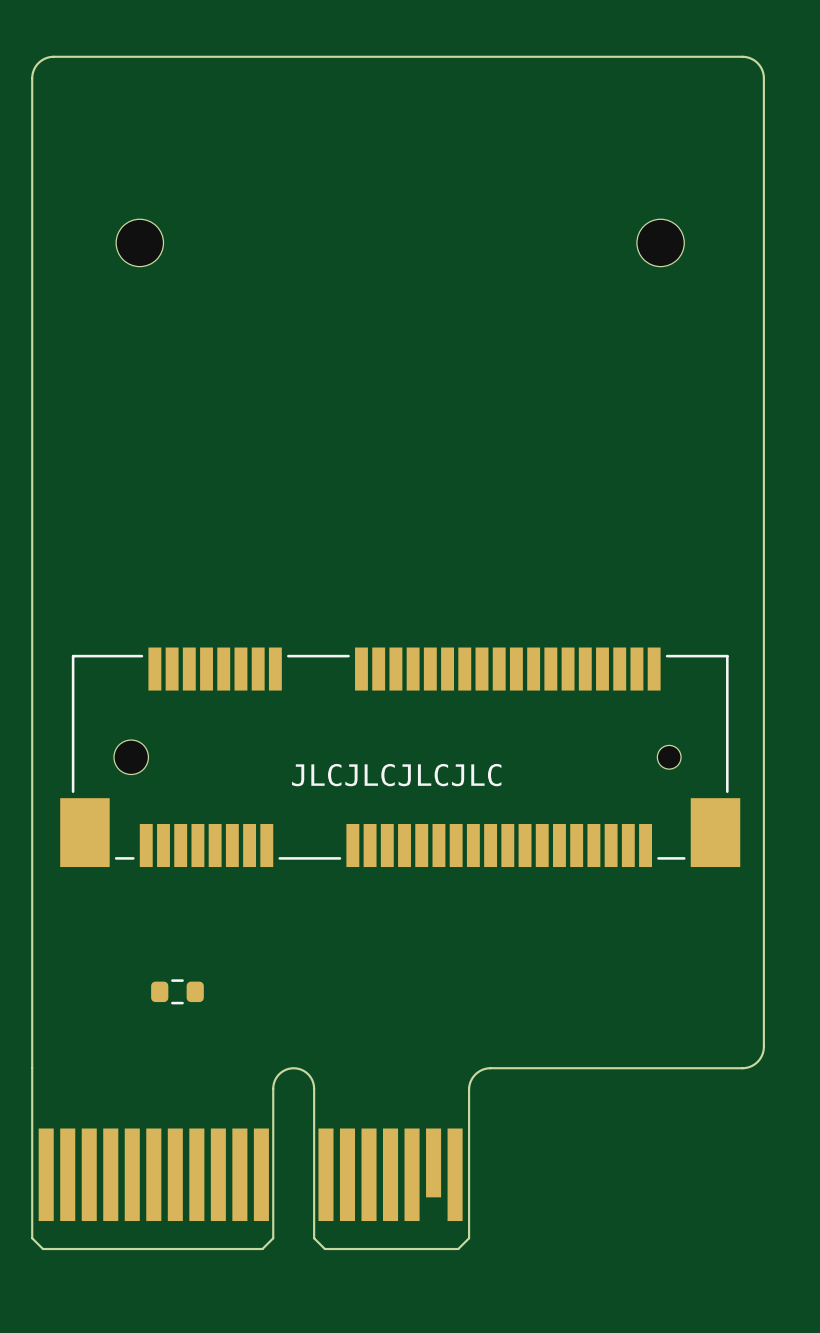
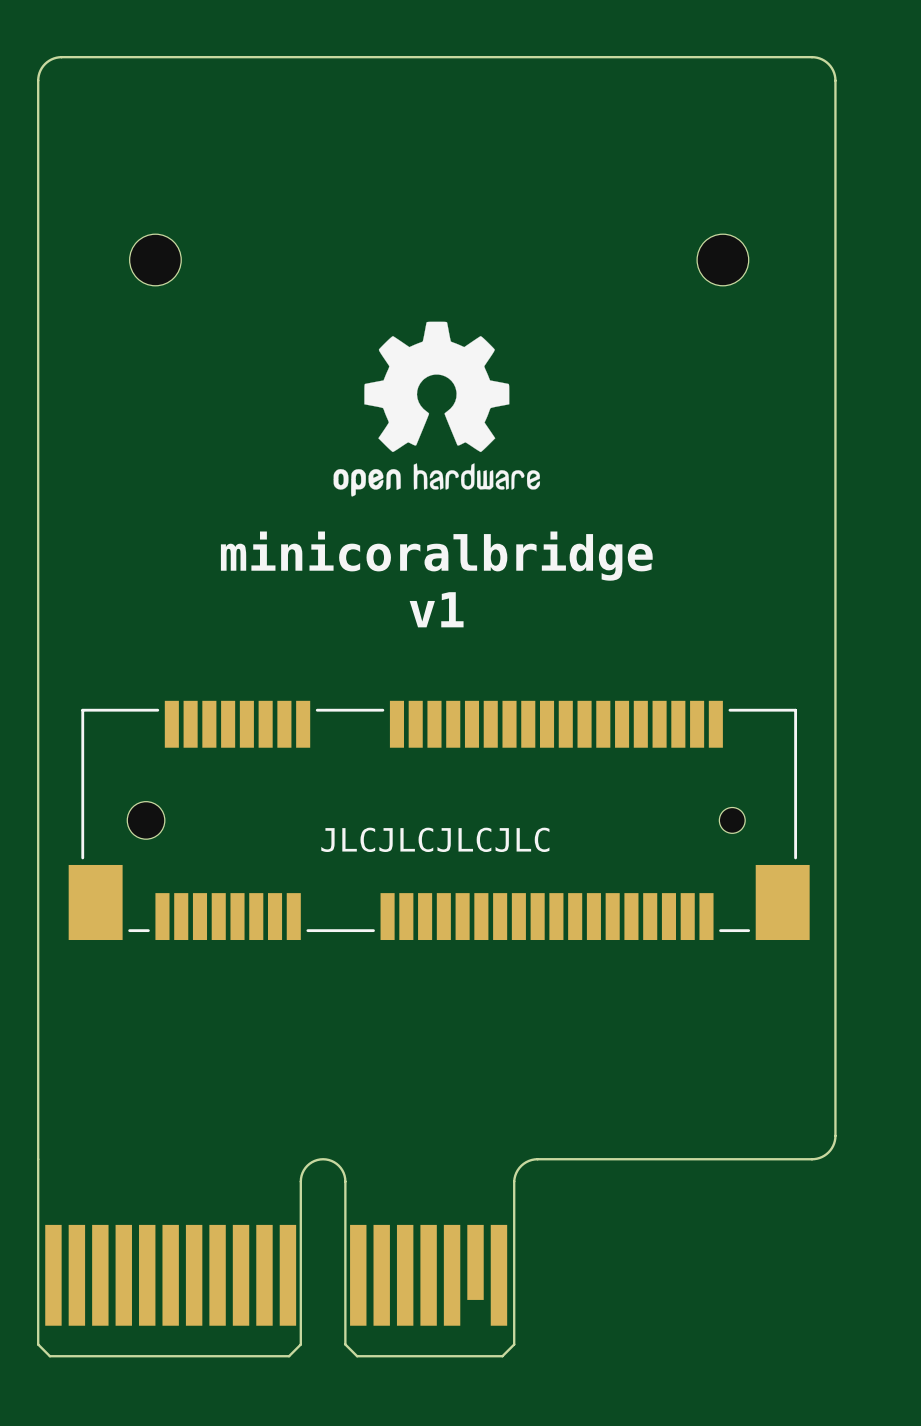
drawing: none -> [333, 321, 541, 497]
text: none -> minicoralbridge (436, 556)
text: none -> v1 (436, 609)
part: (177, 991) -> none

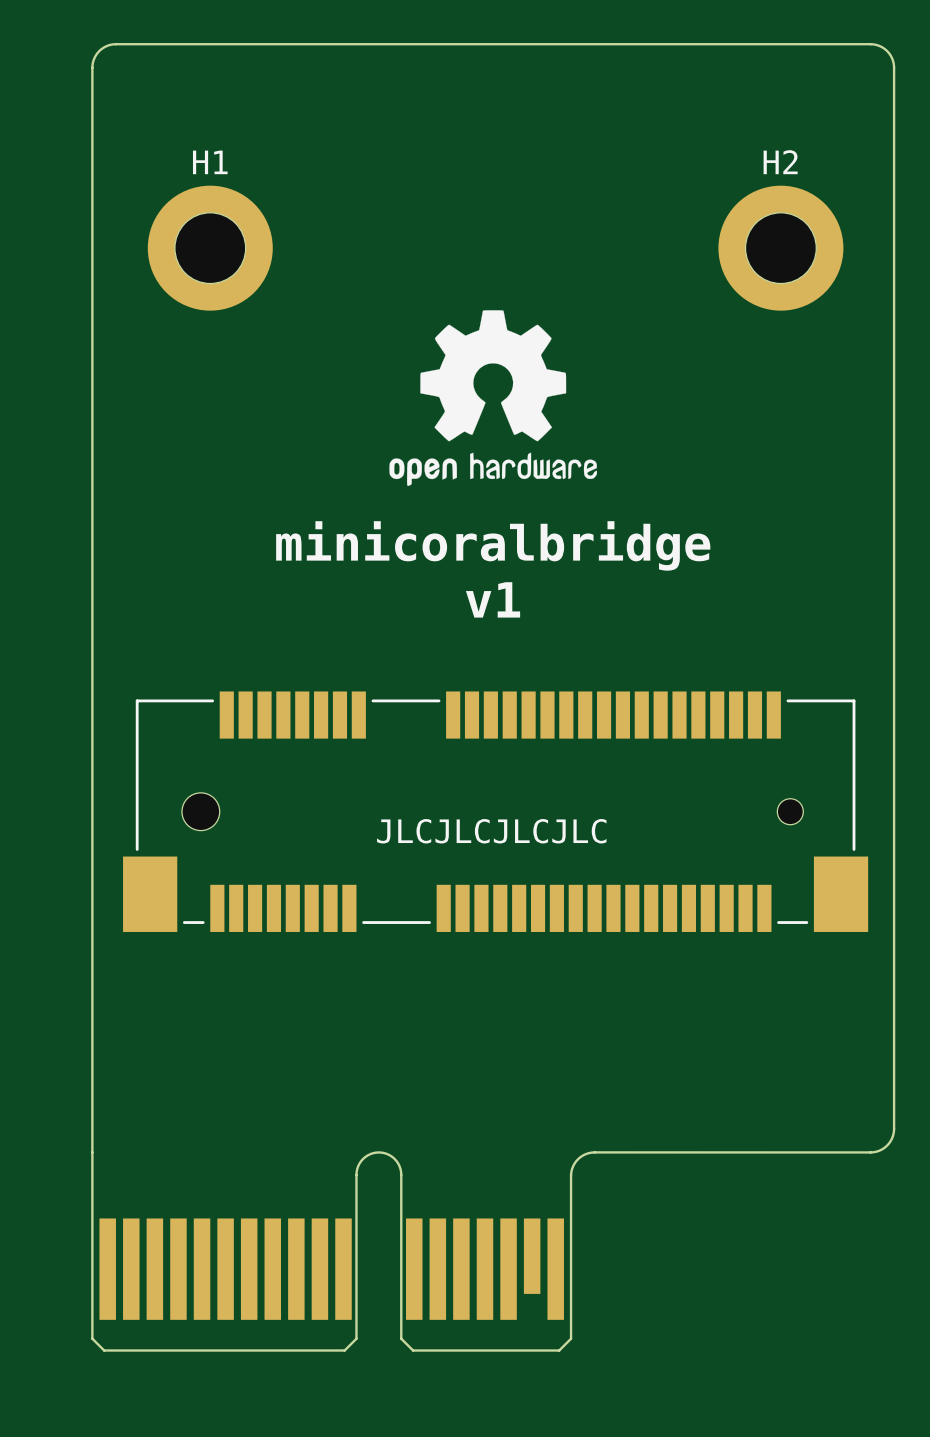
part: (155, 259) -> none
H1: none -> (210, 248)
part: (722, 259) -> none
H2: none -> (780, 248)

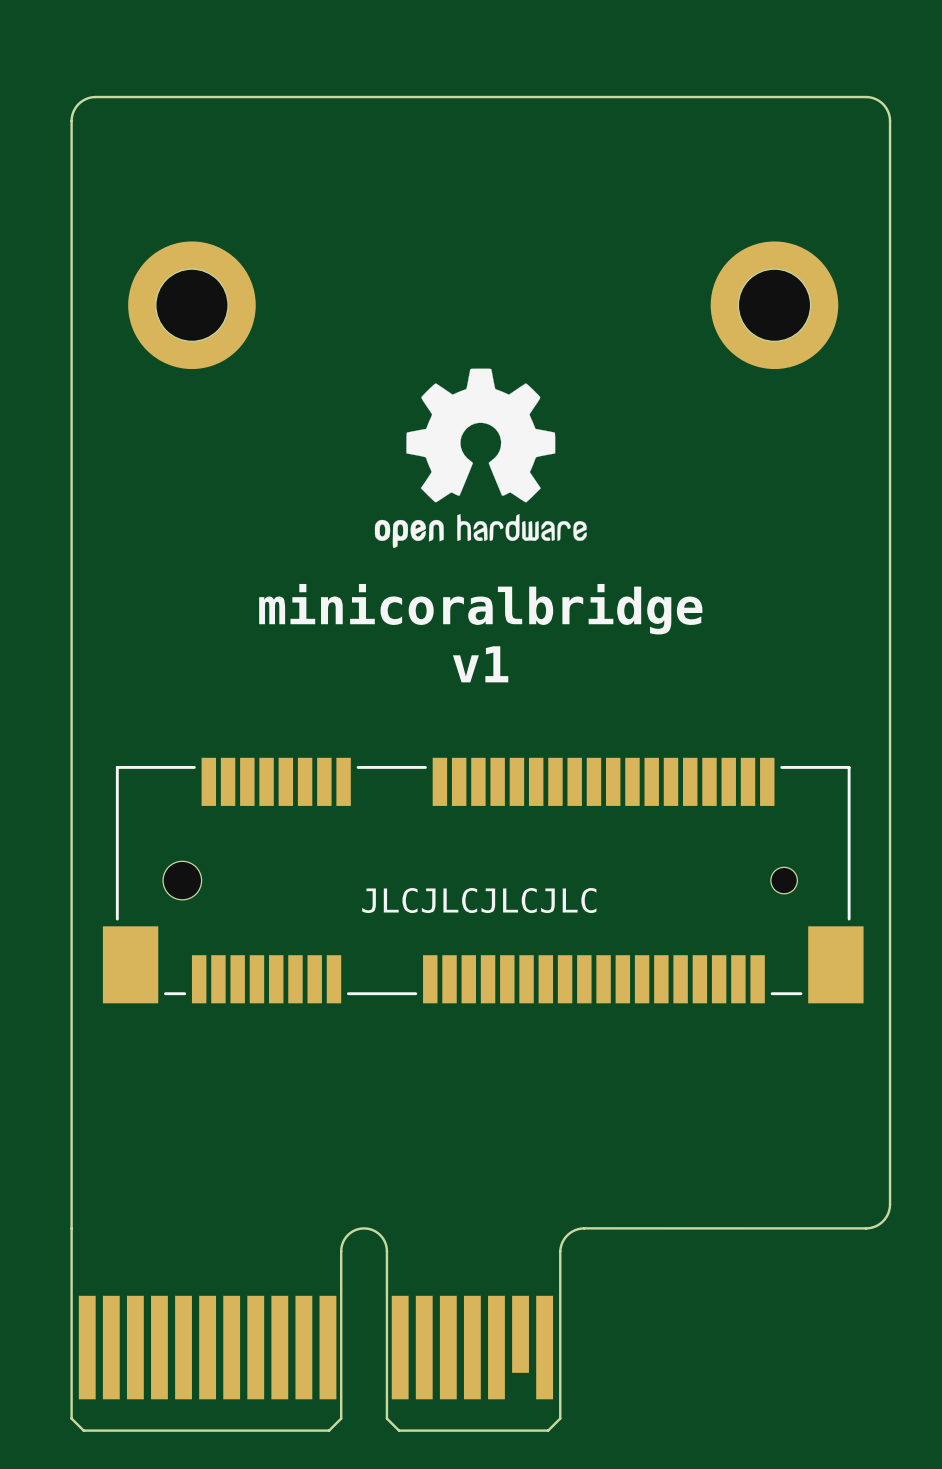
H1 name: H1 (210, 162) -> none
H2 name: H2 (780, 162) -> none

